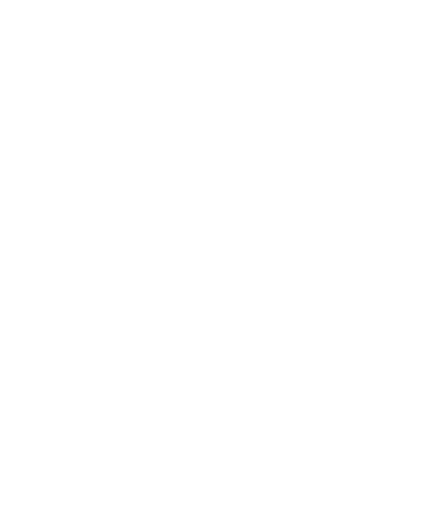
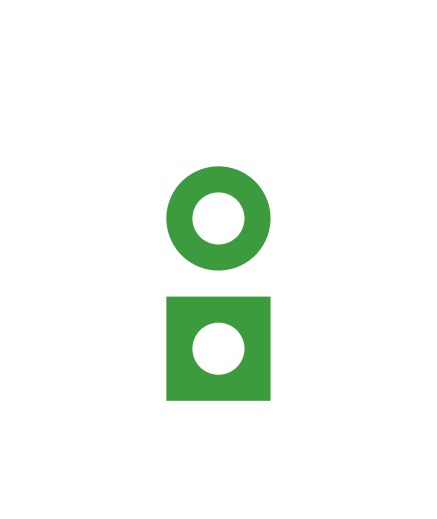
part: none -> (218, 283)

